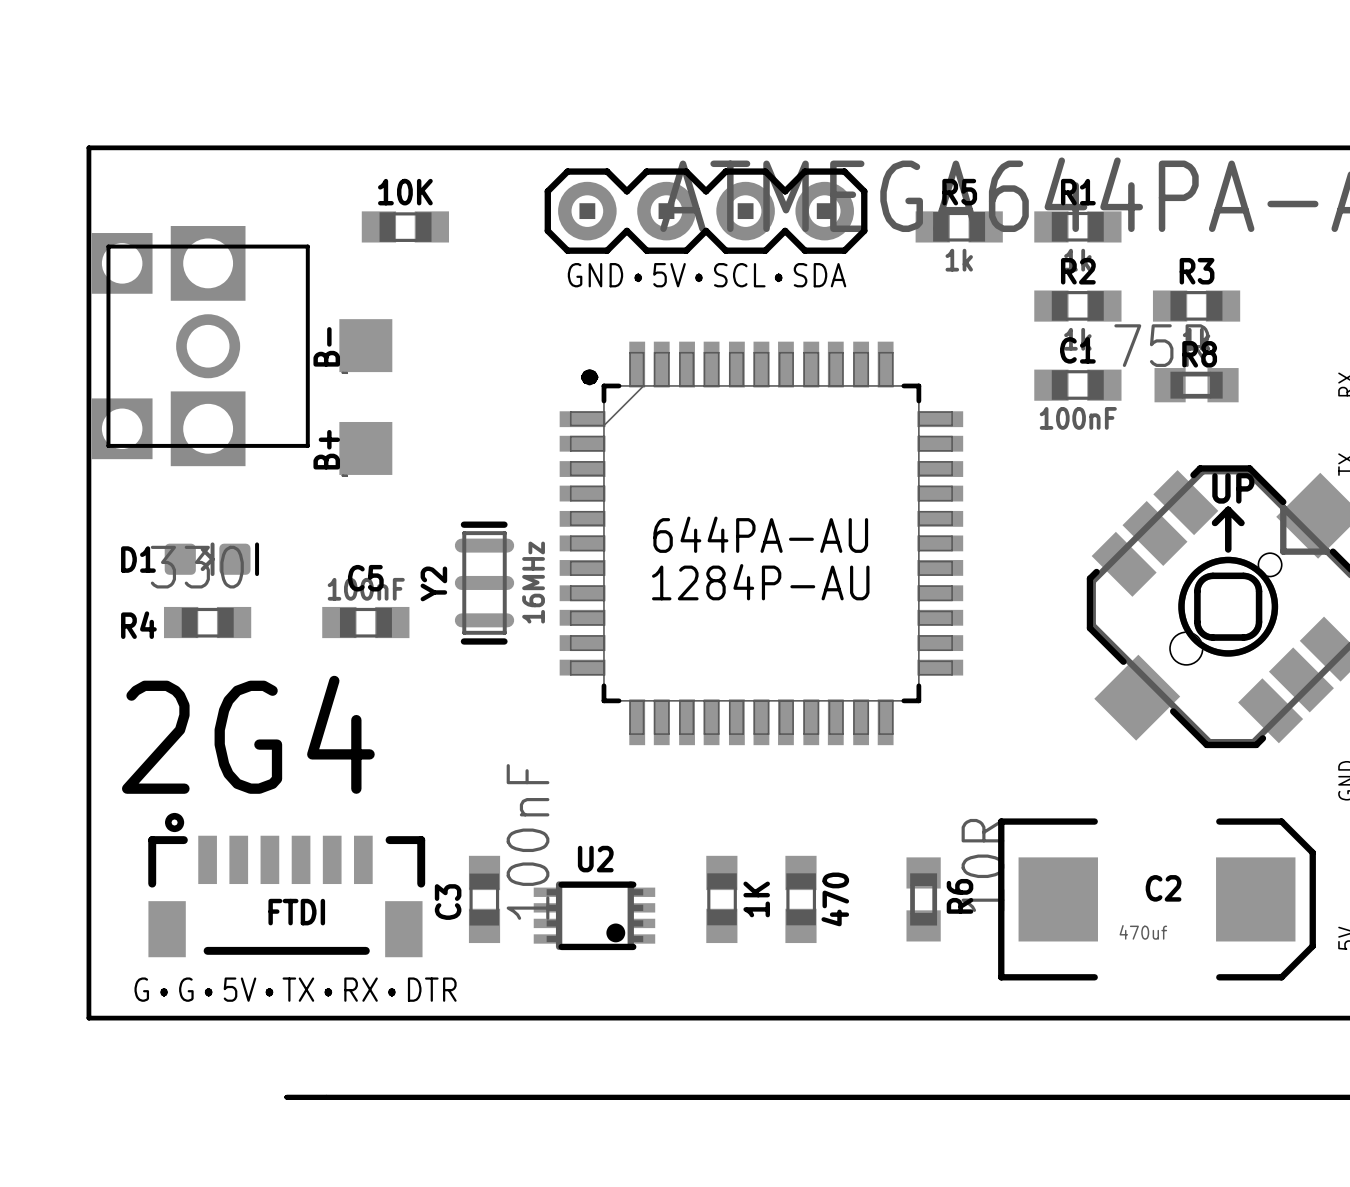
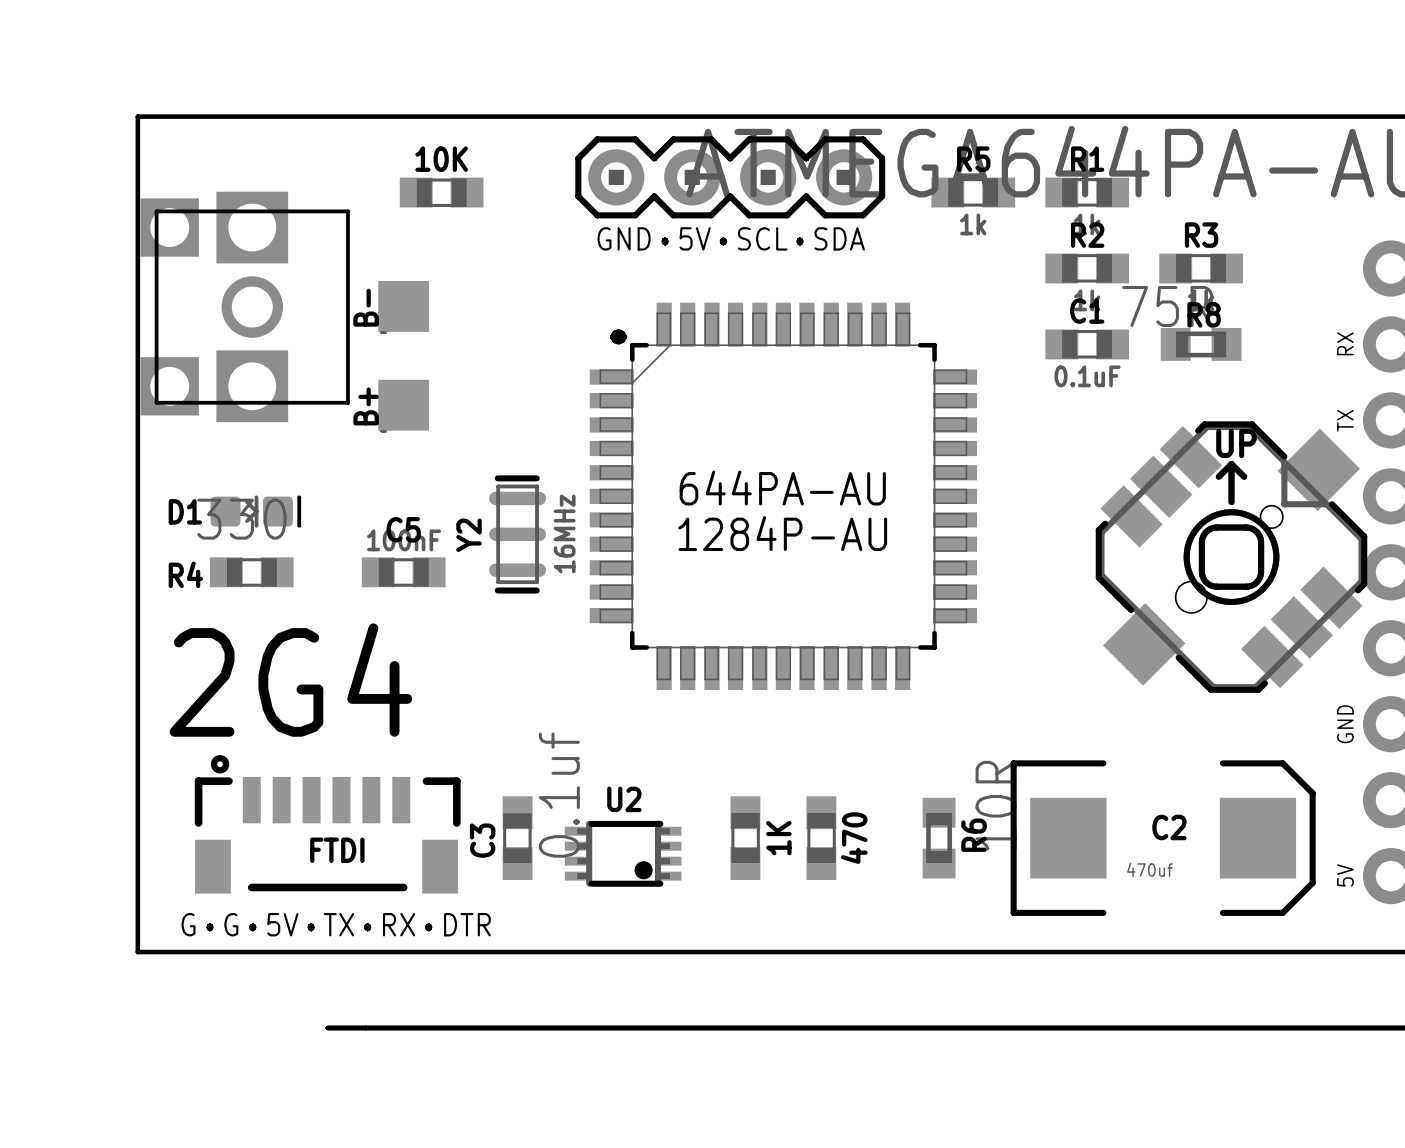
C1 value: 100nF (1078, 418) -> 0.1uF (1087, 376)
C3 value: 100nF (528, 841) -> 0.1uf (559, 795)

